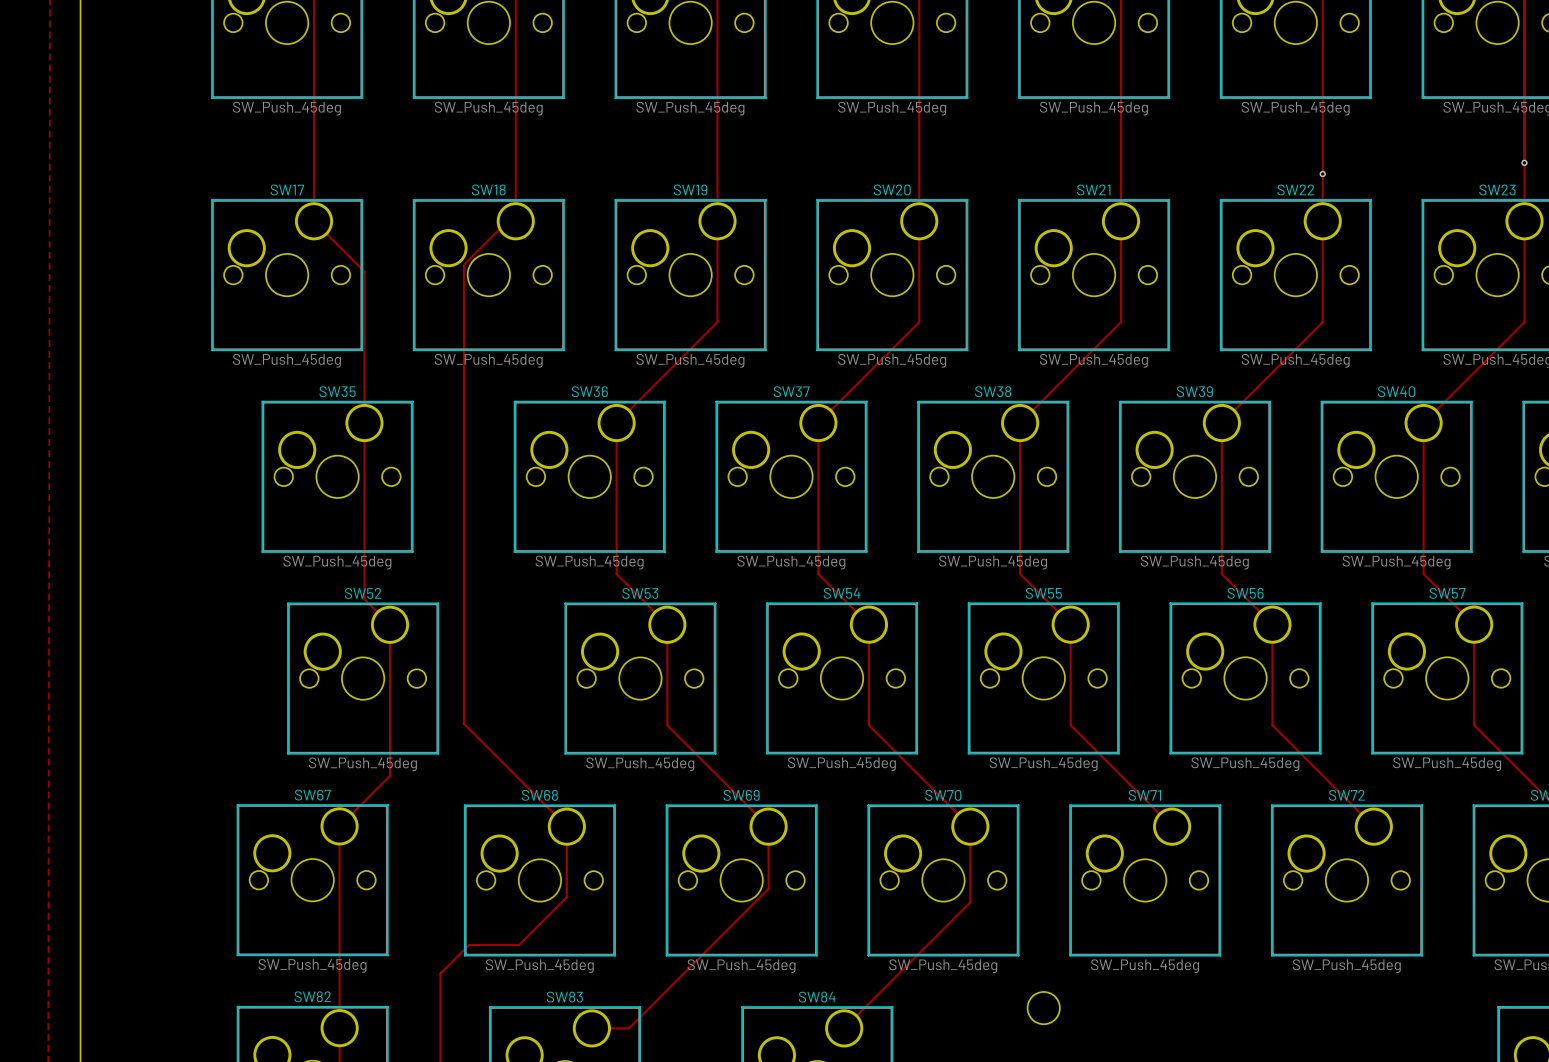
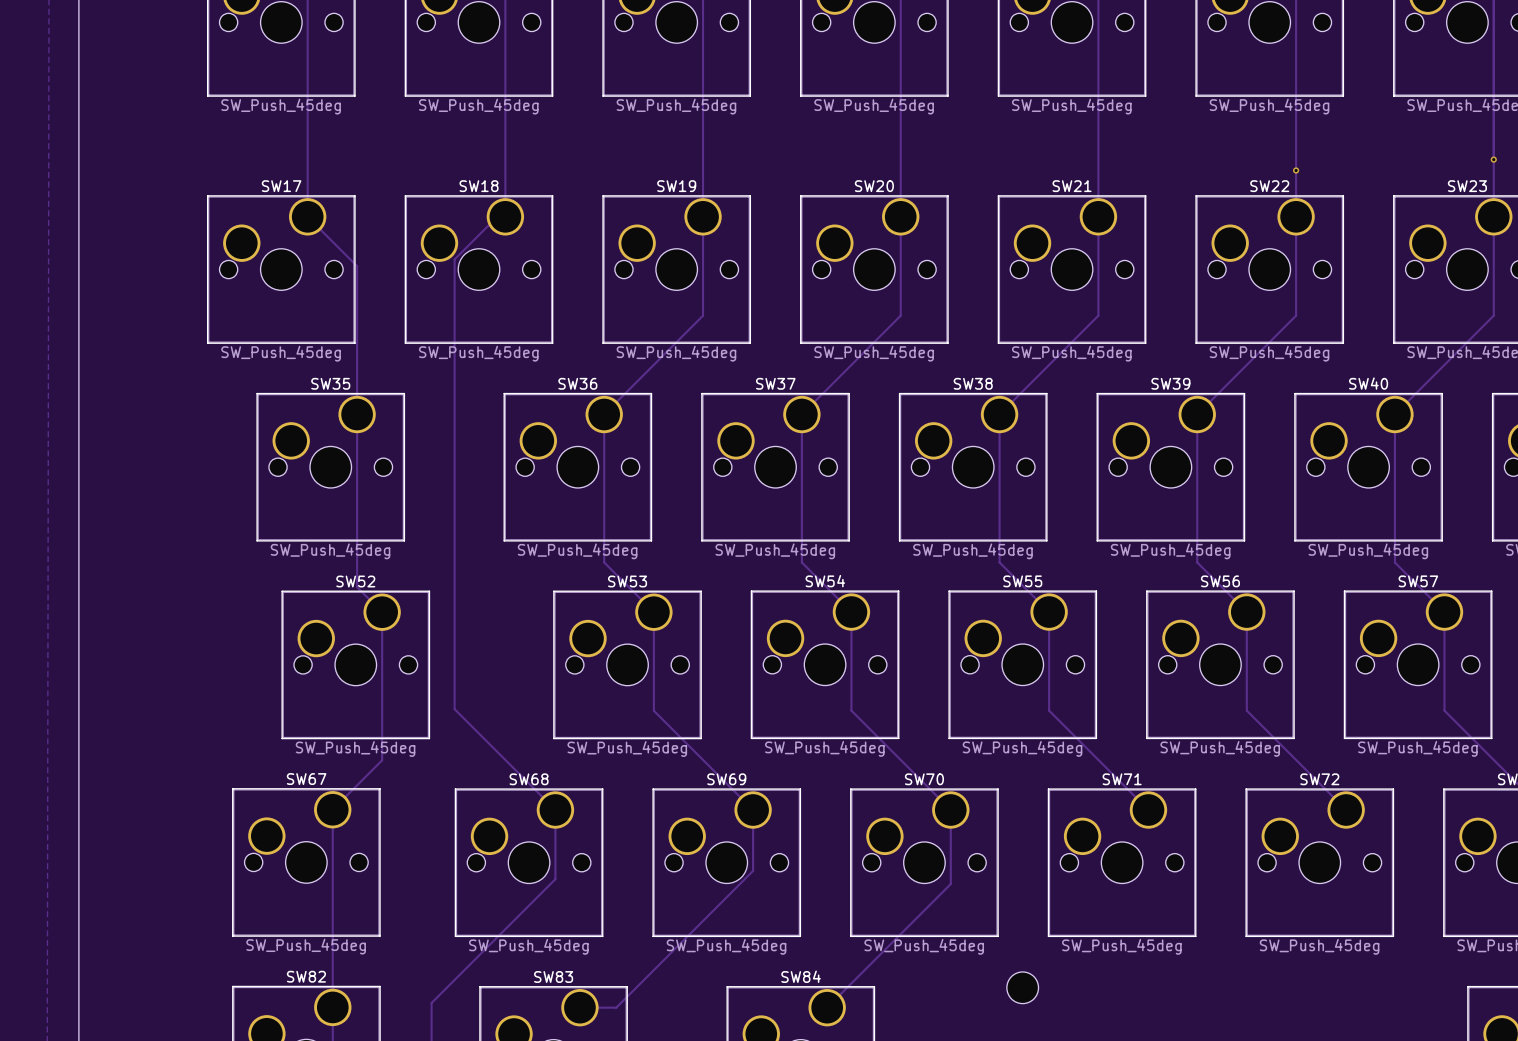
track: (519, 944) (469, 944) (440, 973) (440, 1023) -> (508, 925) (431, 1003)

